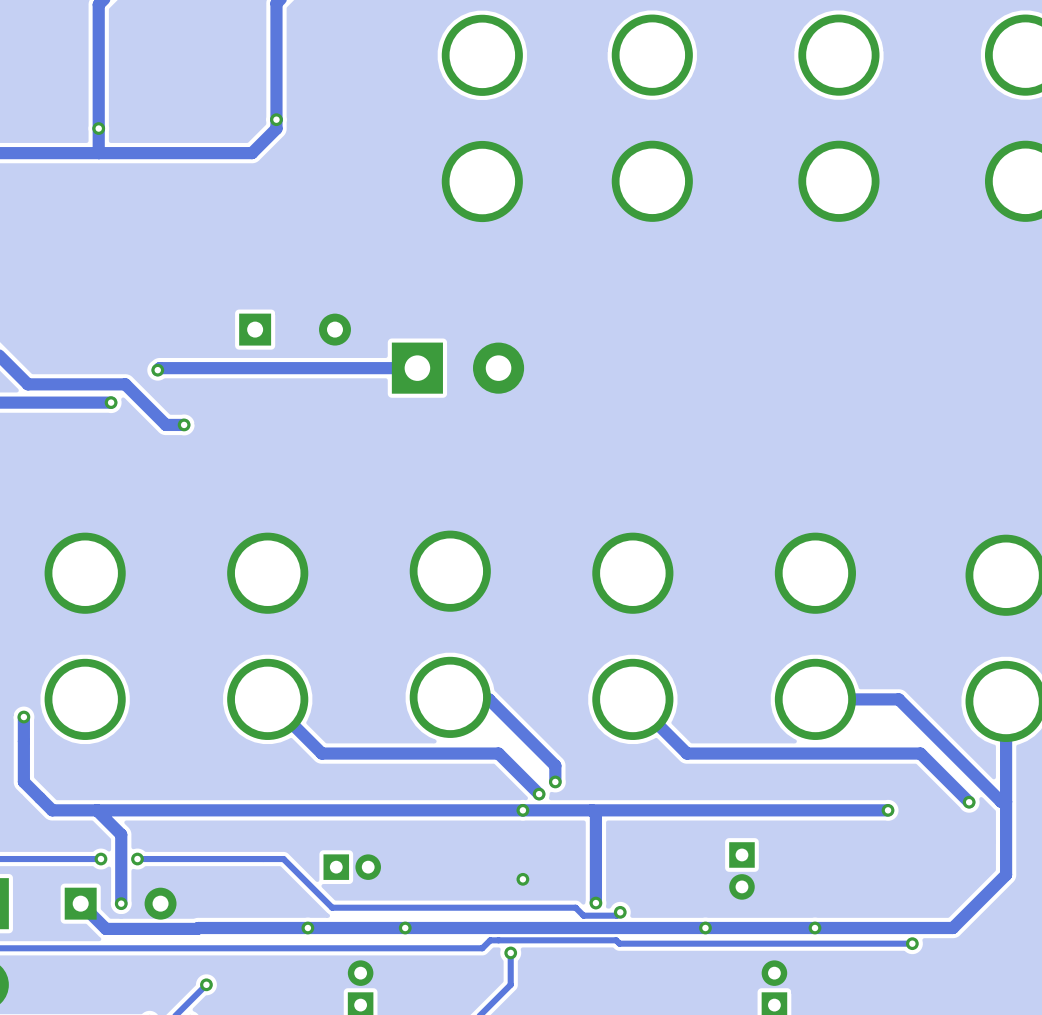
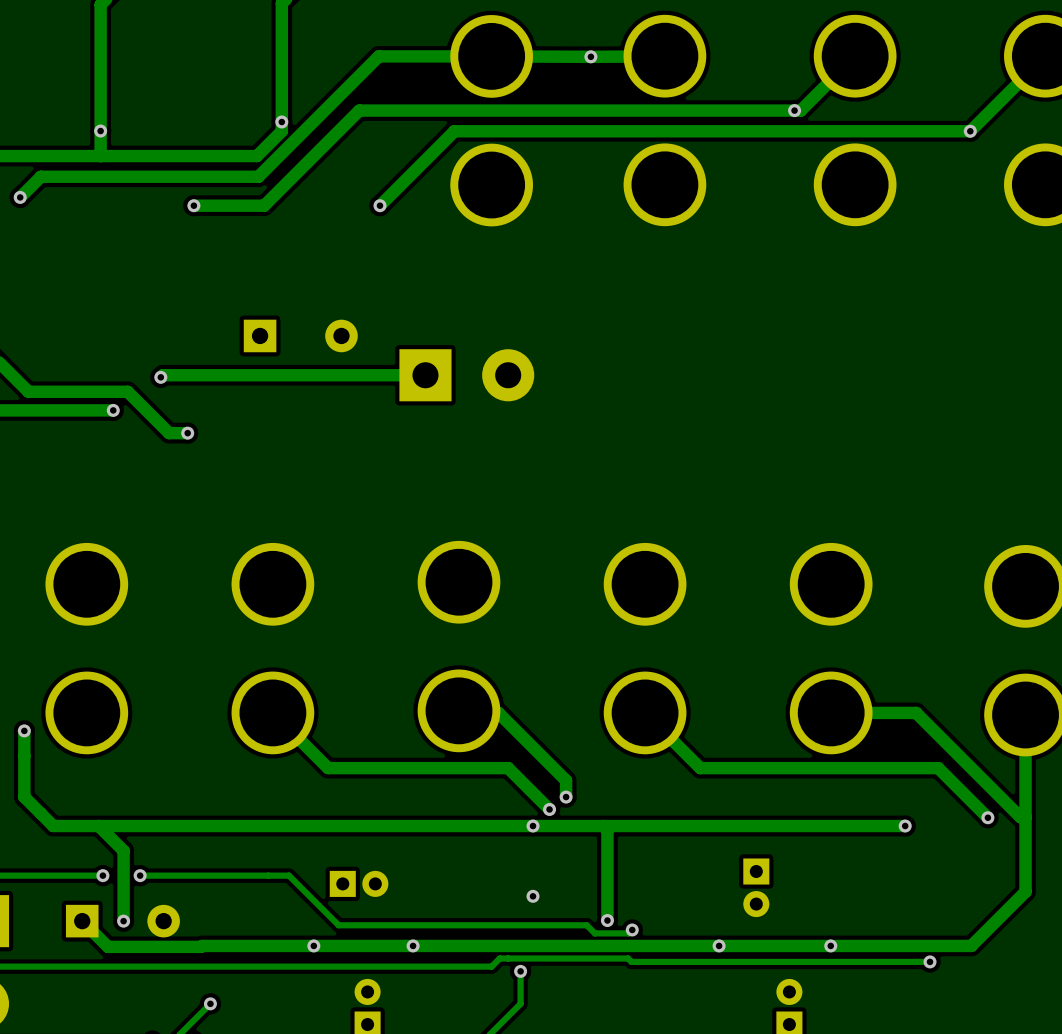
via: none -> (590, 56)
track: none -> (664, 56) (378, 56) (258, 176) (40, 176) (20, 197)
track: none -> (855, 56) (800, 110) (359, 110) (264, 205) (193, 205)
track: none -> (1045, 56) (970, 131) (454, 131) (379, 205)
via: none -> (794, 110)
via: none -> (970, 131)
via: none -> (20, 197)
via: none -> (193, 205)
via: none -> (379, 205)

